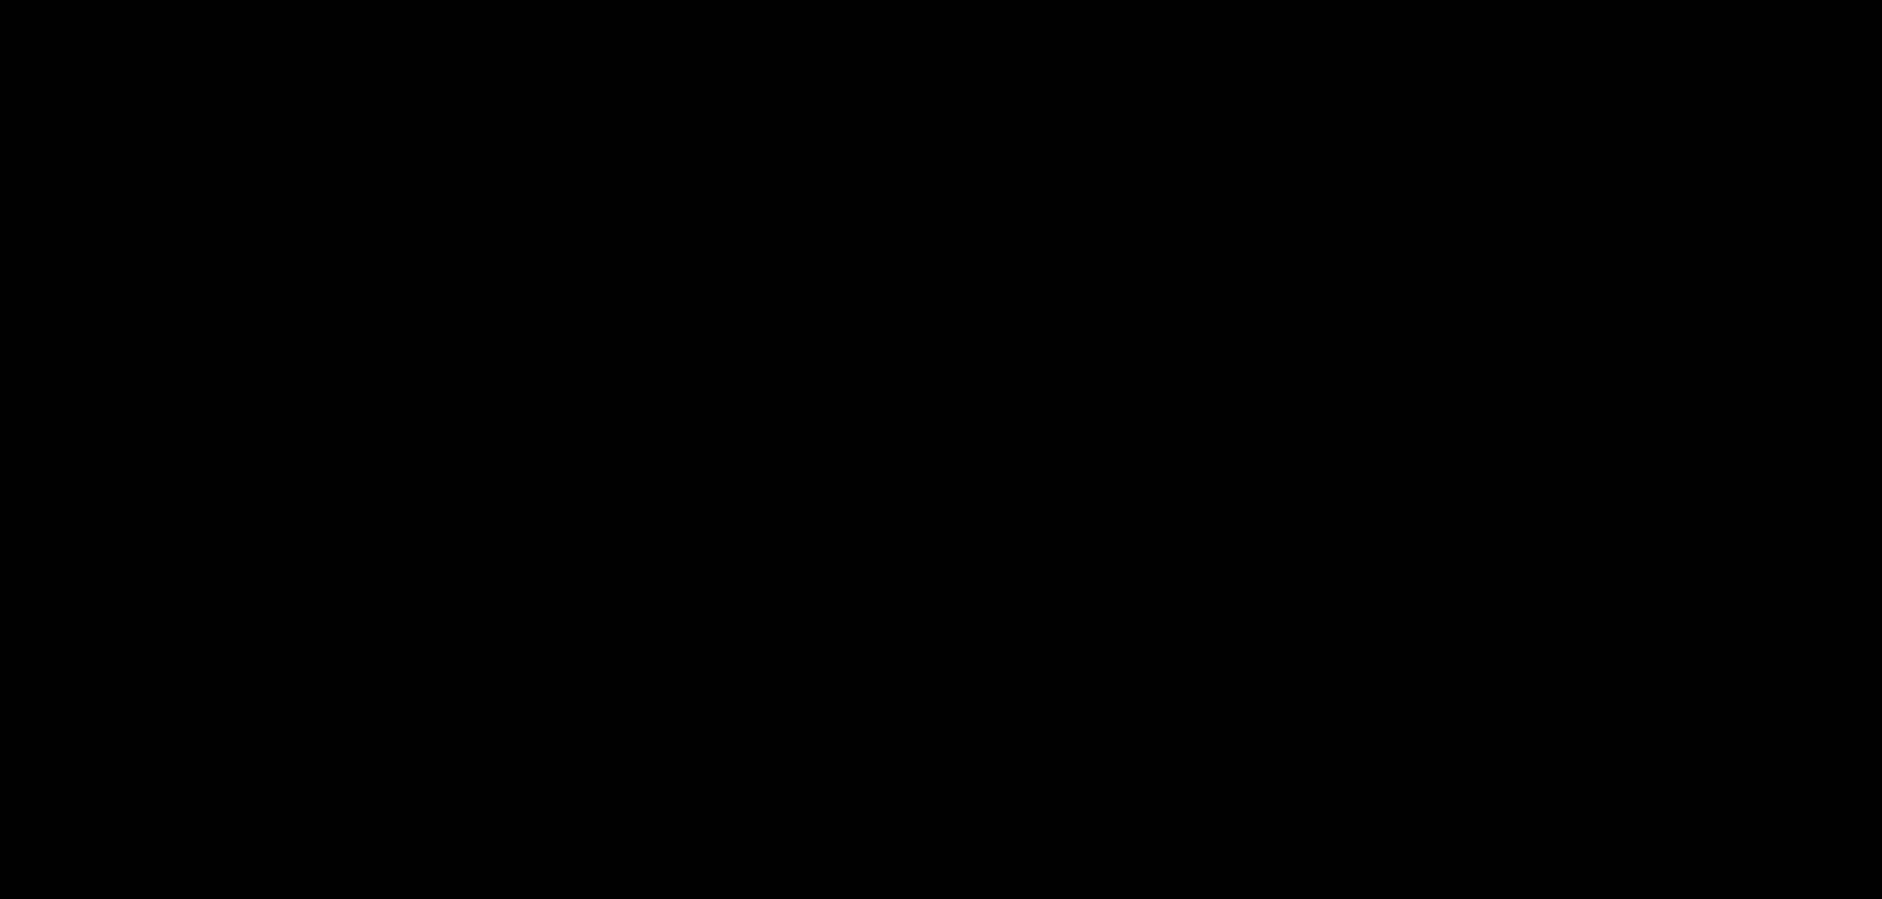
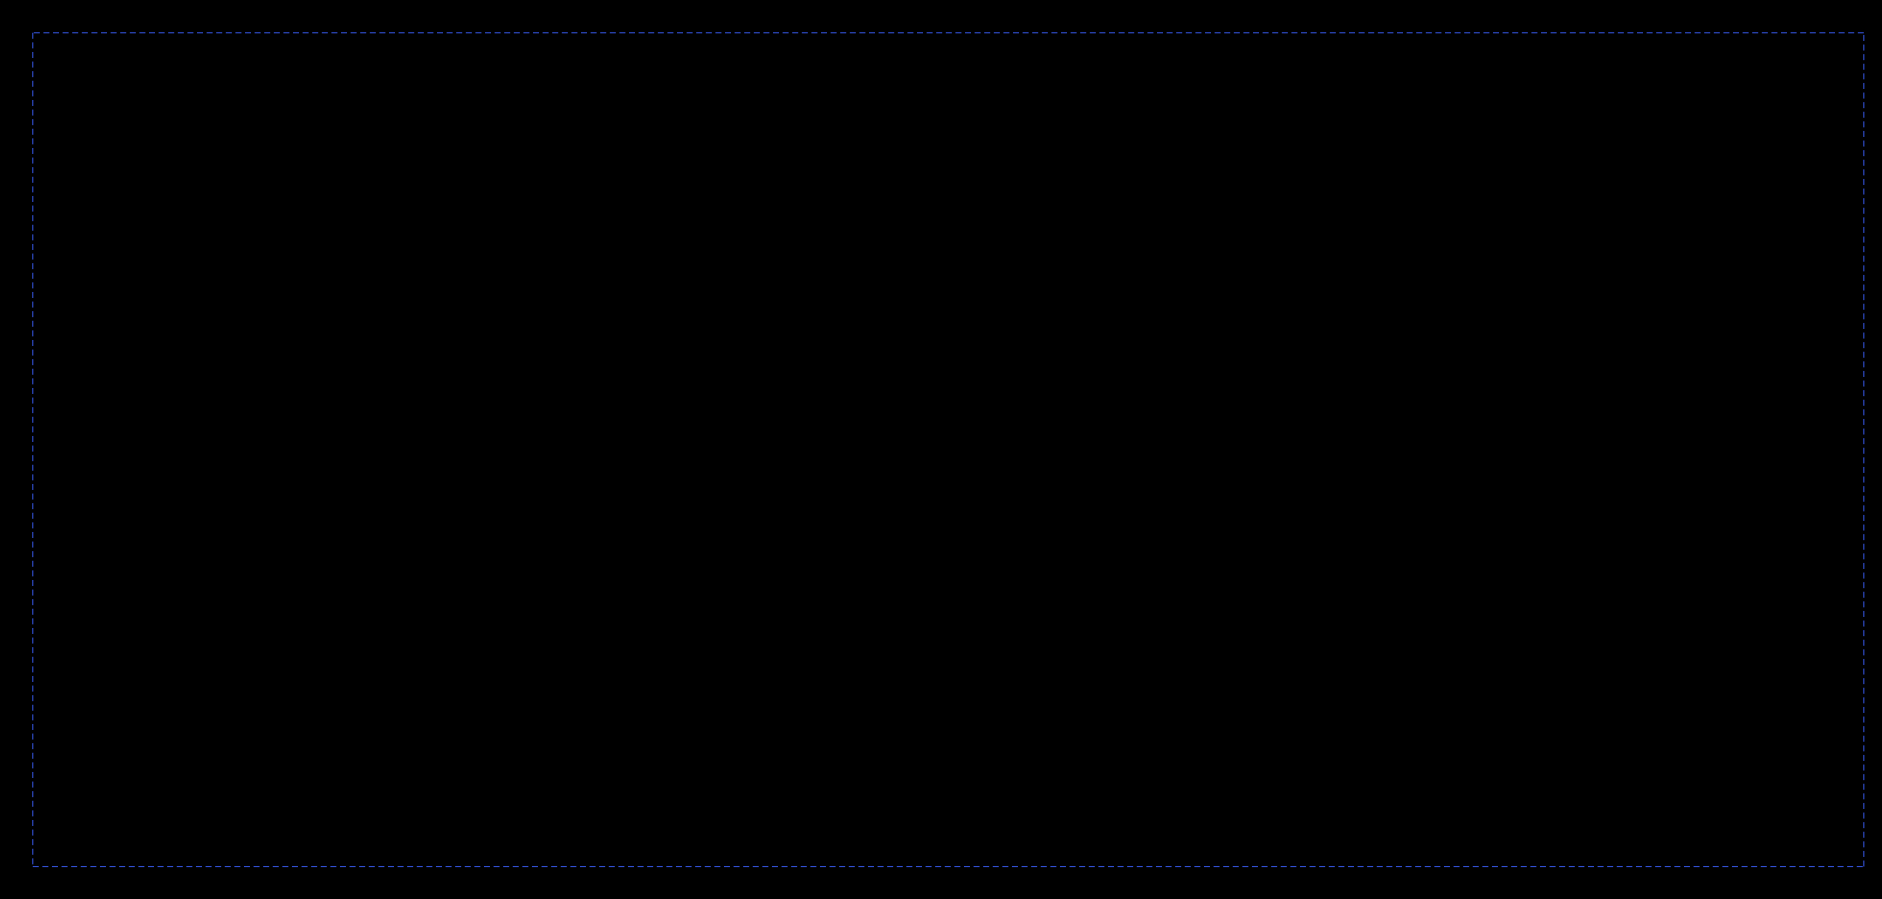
zone outline: none -> (1863, 32) (1863, 866) (32, 866) (32, 32) (1863, 32)

